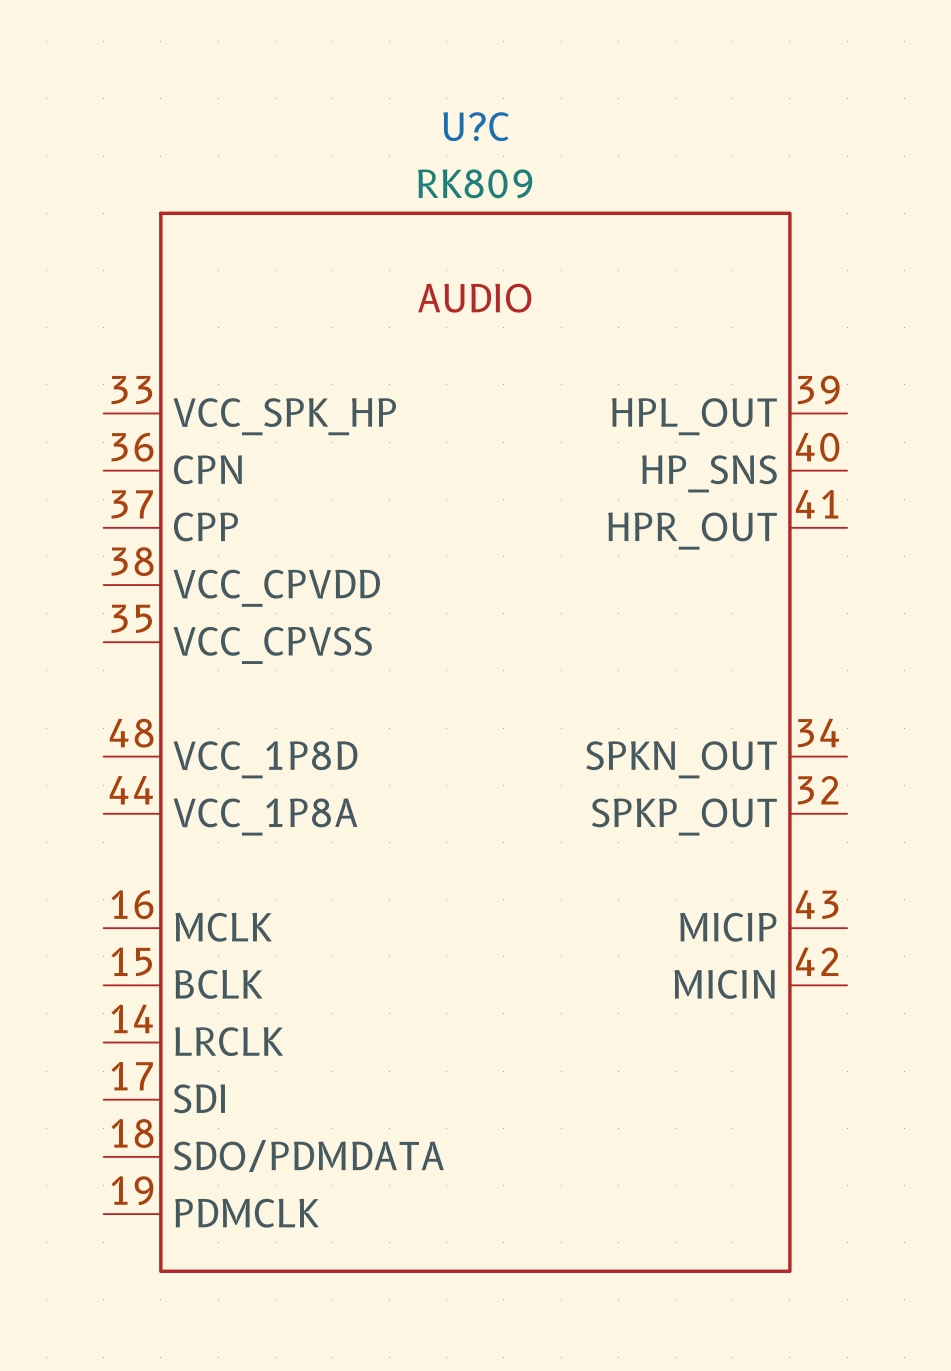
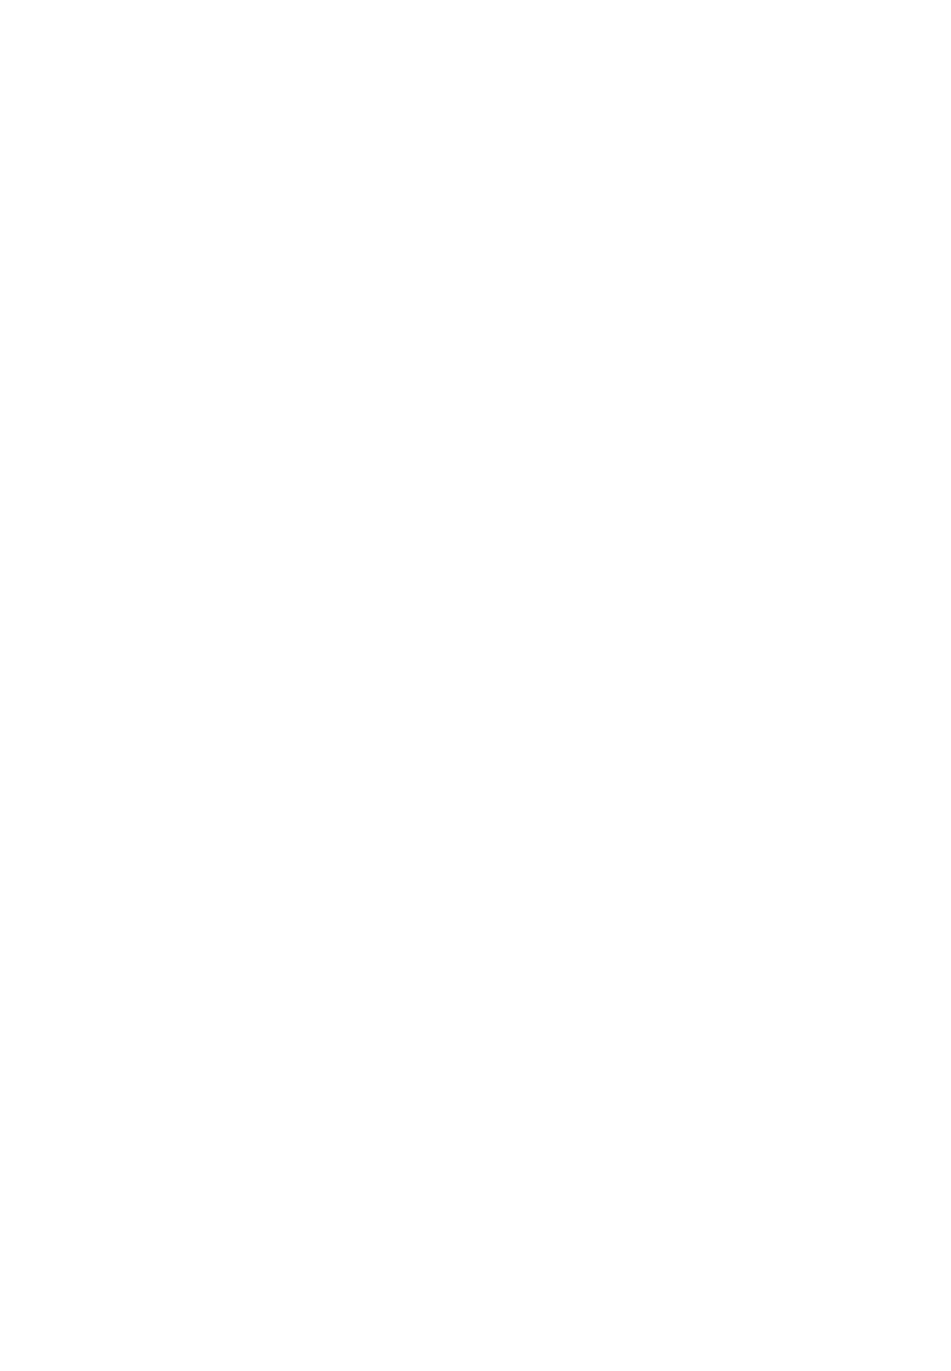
U?C: RK809 (475, 742) -> none

